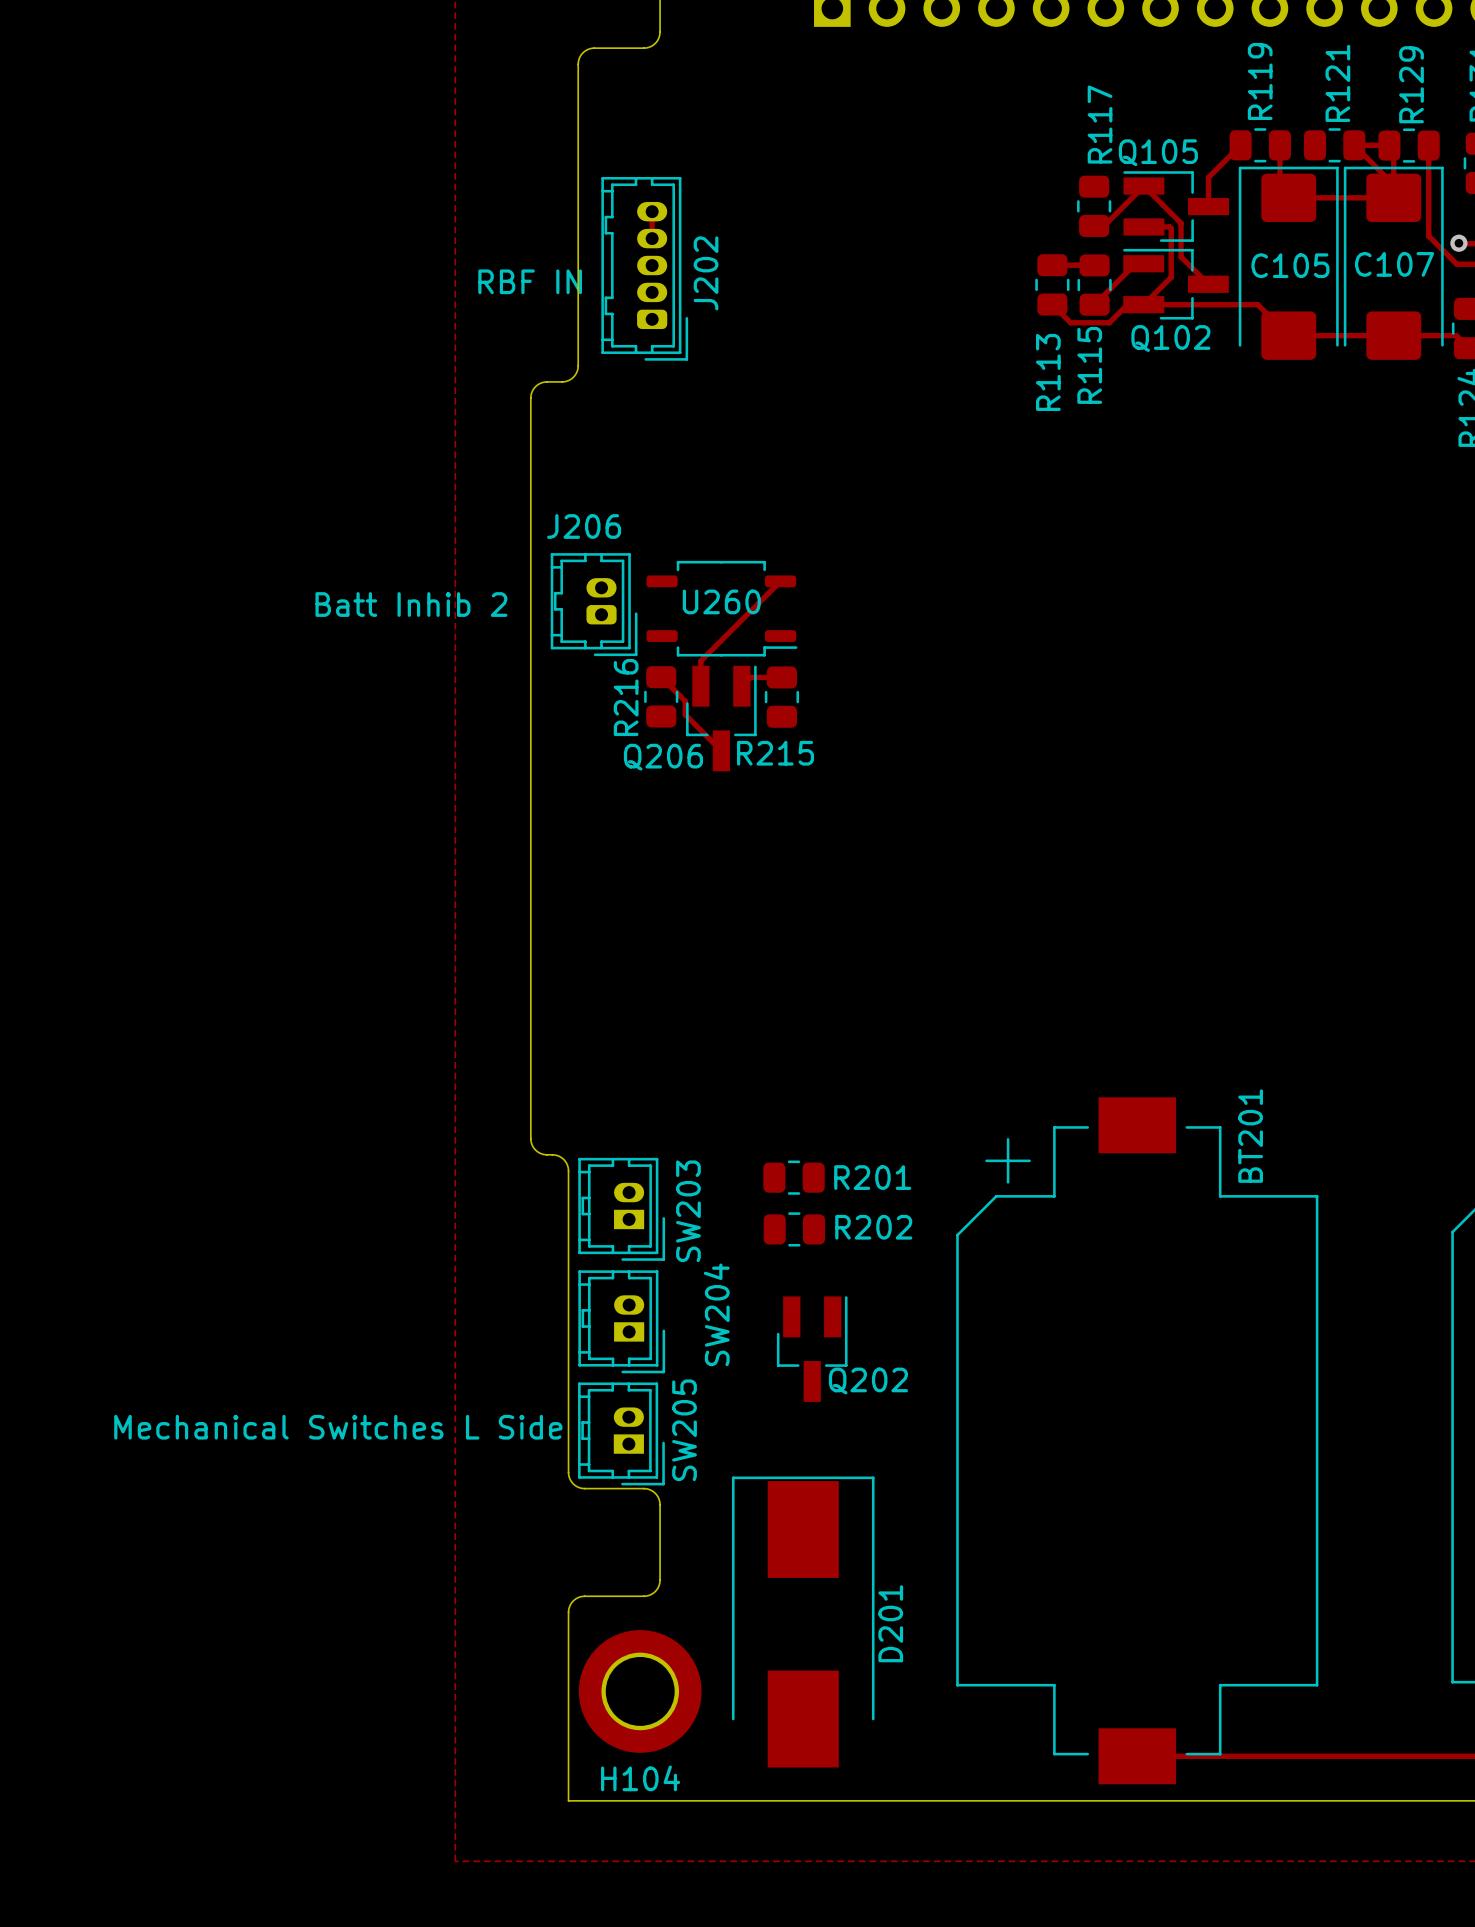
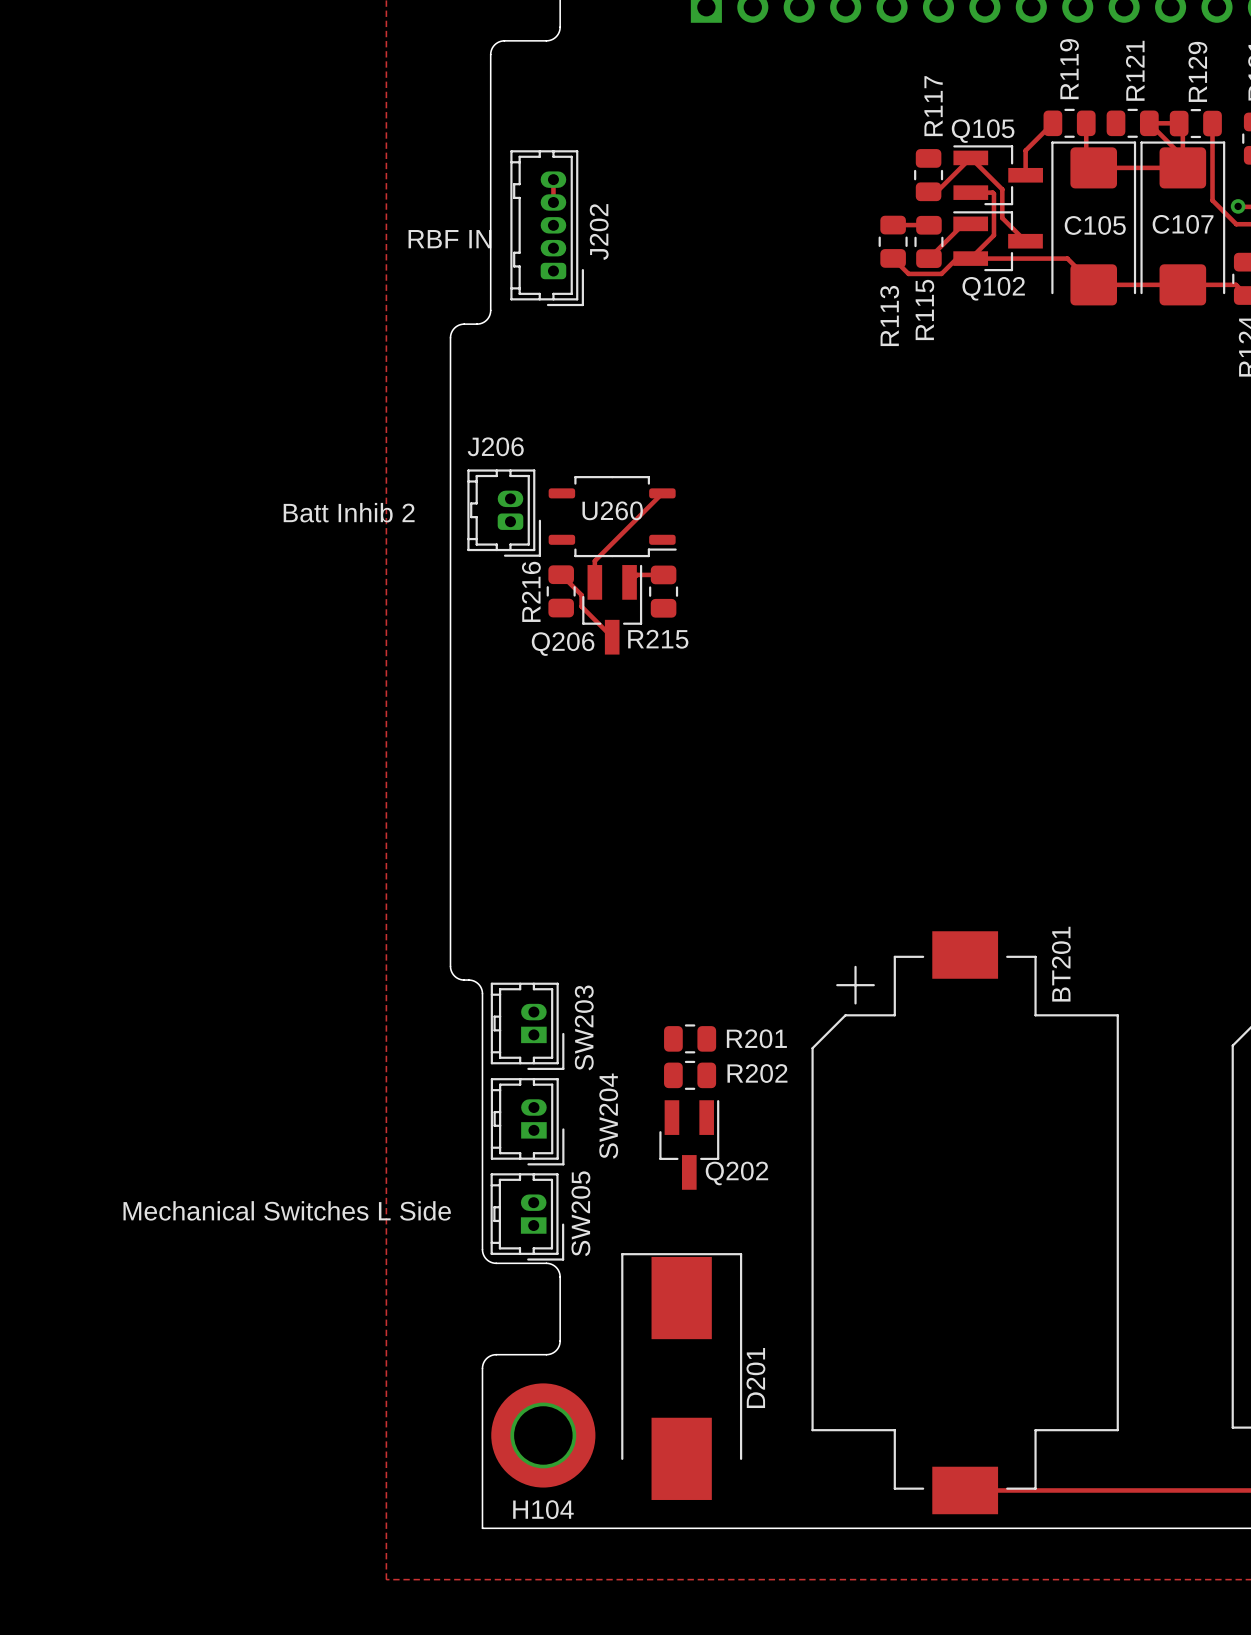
R201 position: (794, 1177) -> (690, 1038)
R202 position: (794, 1229) -> (690, 1075)

